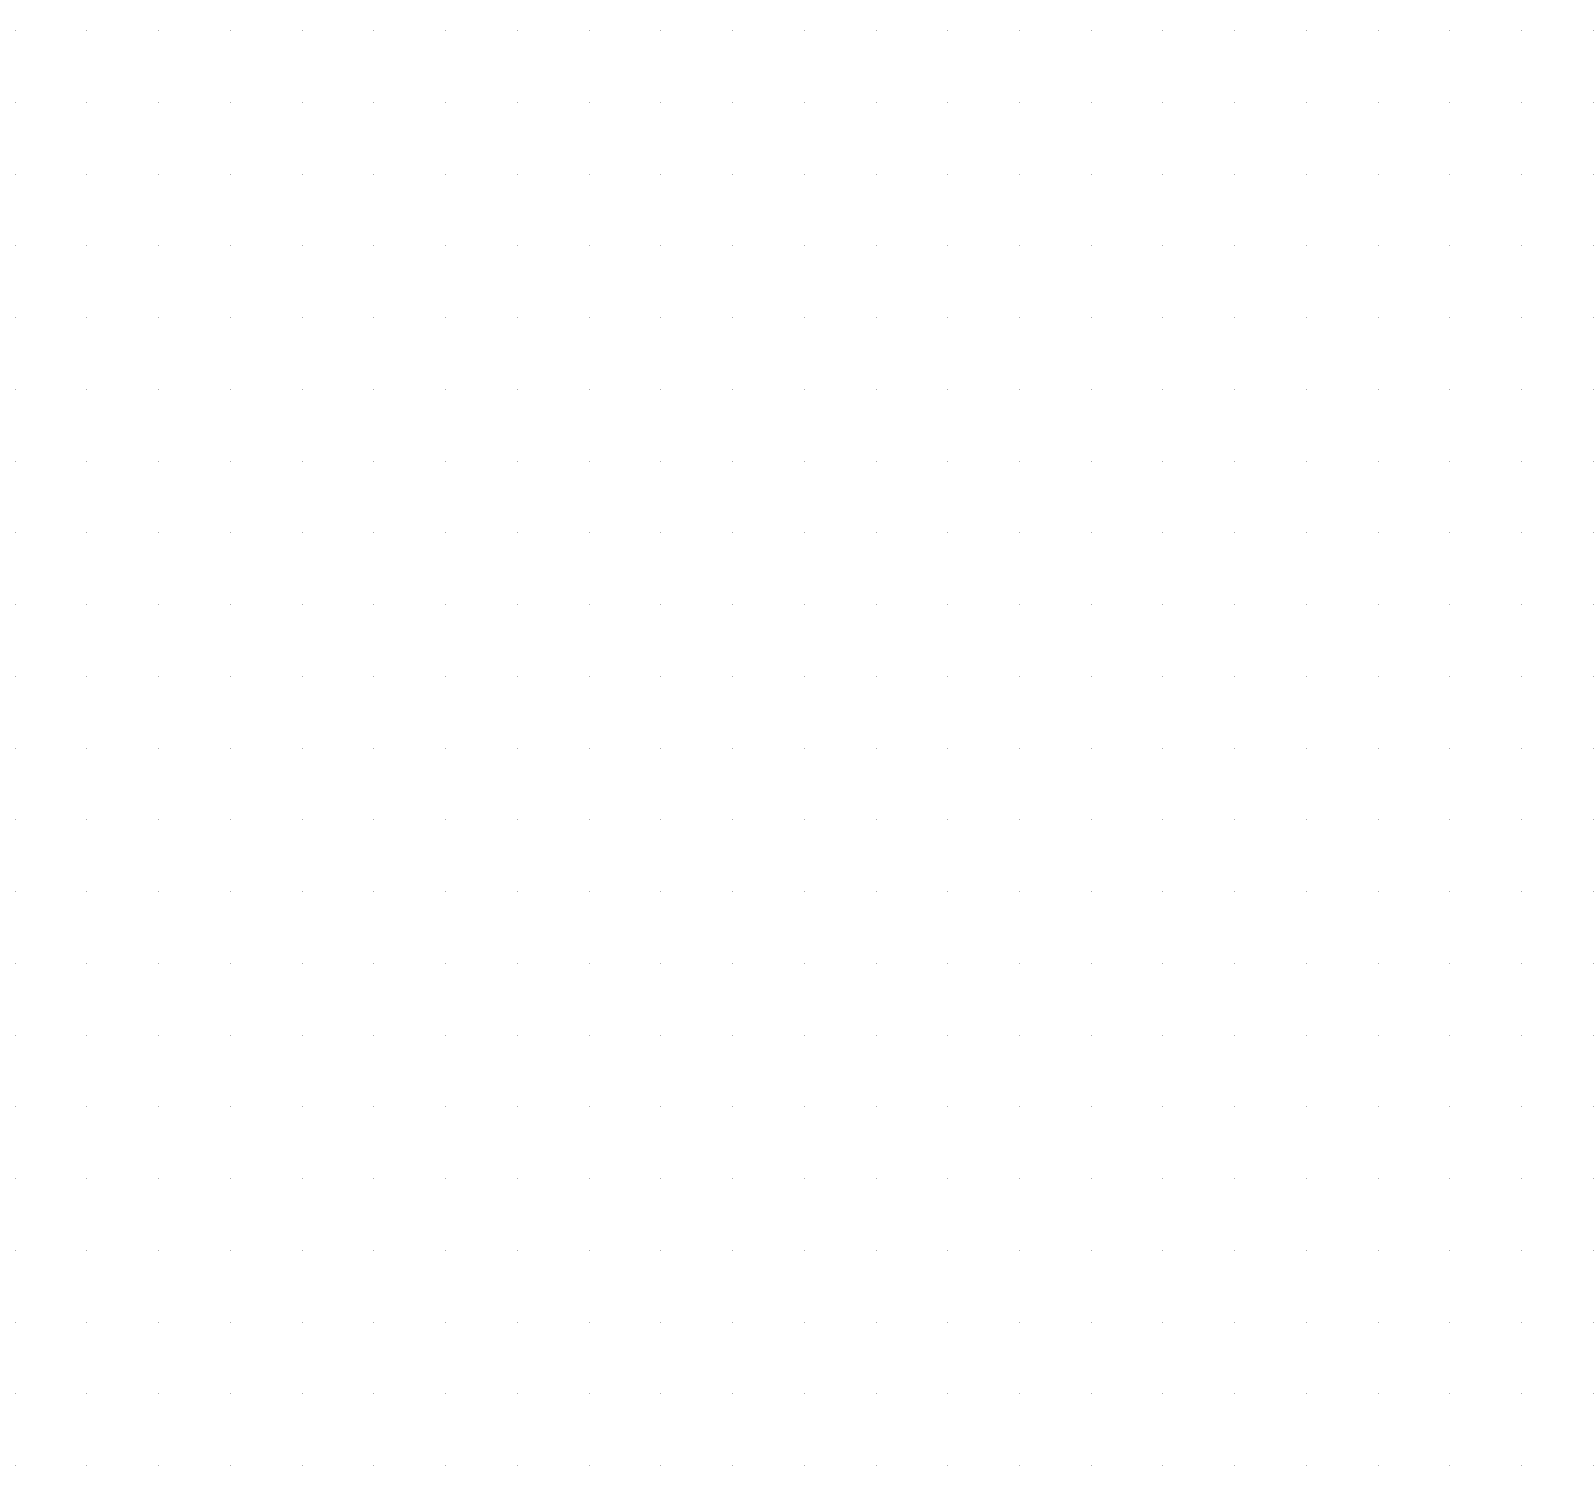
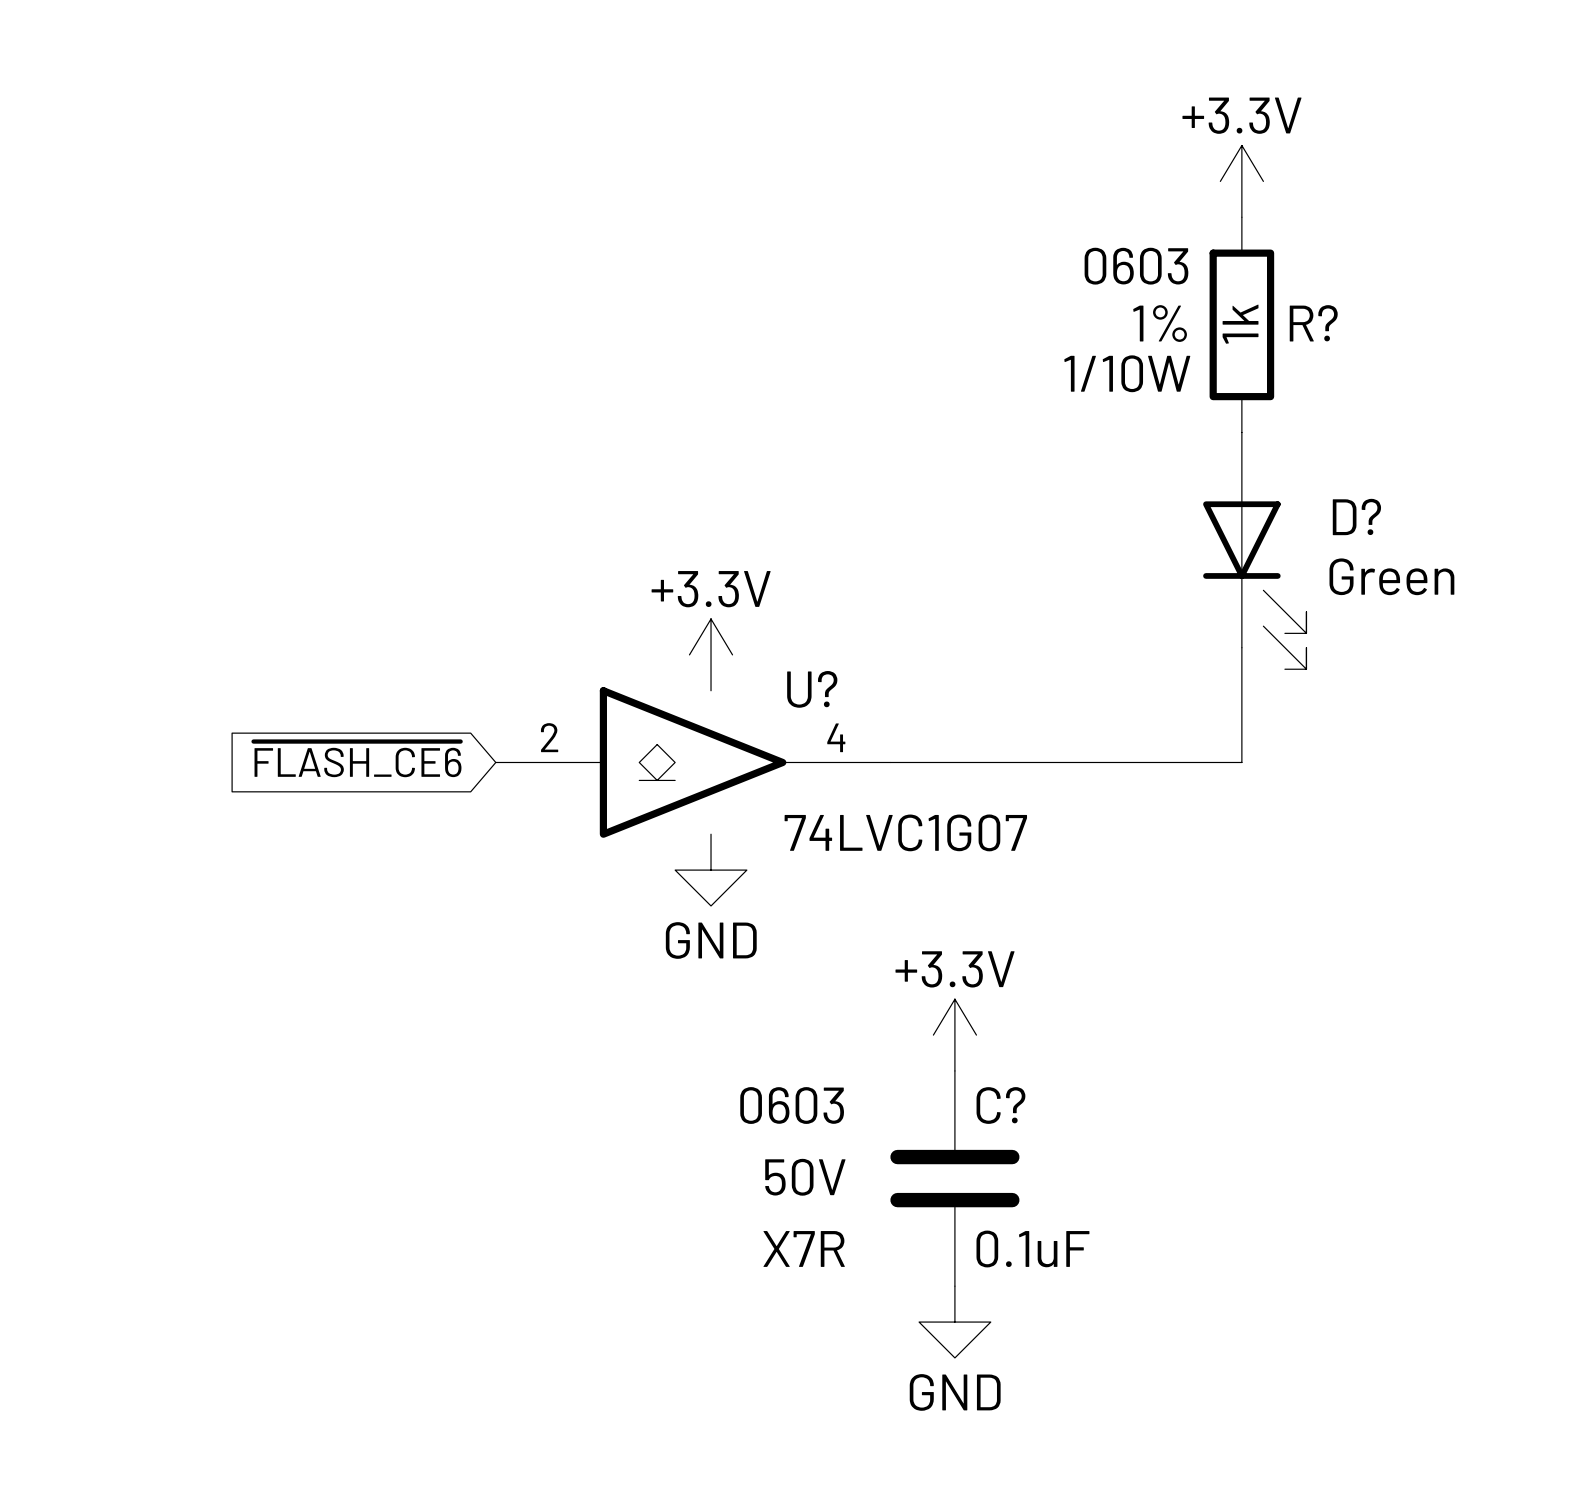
power symbol: none -> +3.3V (1241, 181)
R?: none -> 1k (1241, 324)
D?: none -> Green (1254, 550)
wire: none -> (1241, 647) (1241, 762) (890, 762)
power symbol: none -> +3.3V (711, 654)
U?: none -> 74LVC1G07 (693, 762)
global label: none -> ~{FLASH_CE6} (357, 759)
power symbol: none -> GND (711, 870)
power symbol: none -> +3.3V (954, 1035)
C?: none -> 0.1uF (954, 1178)
power symbol: none -> GND (954, 1322)

